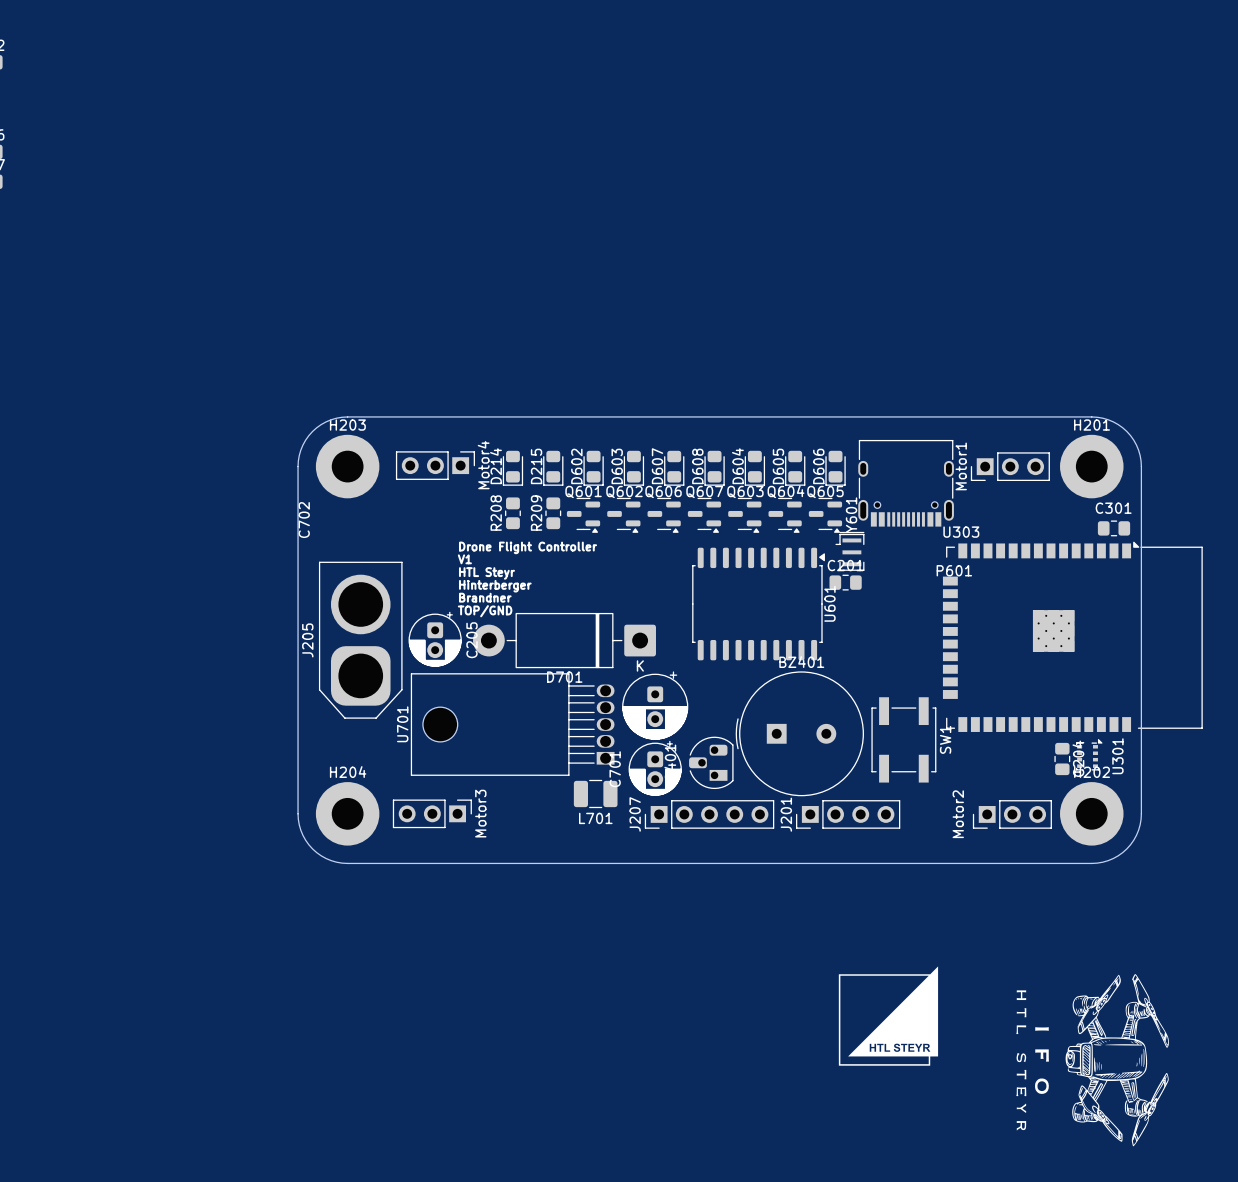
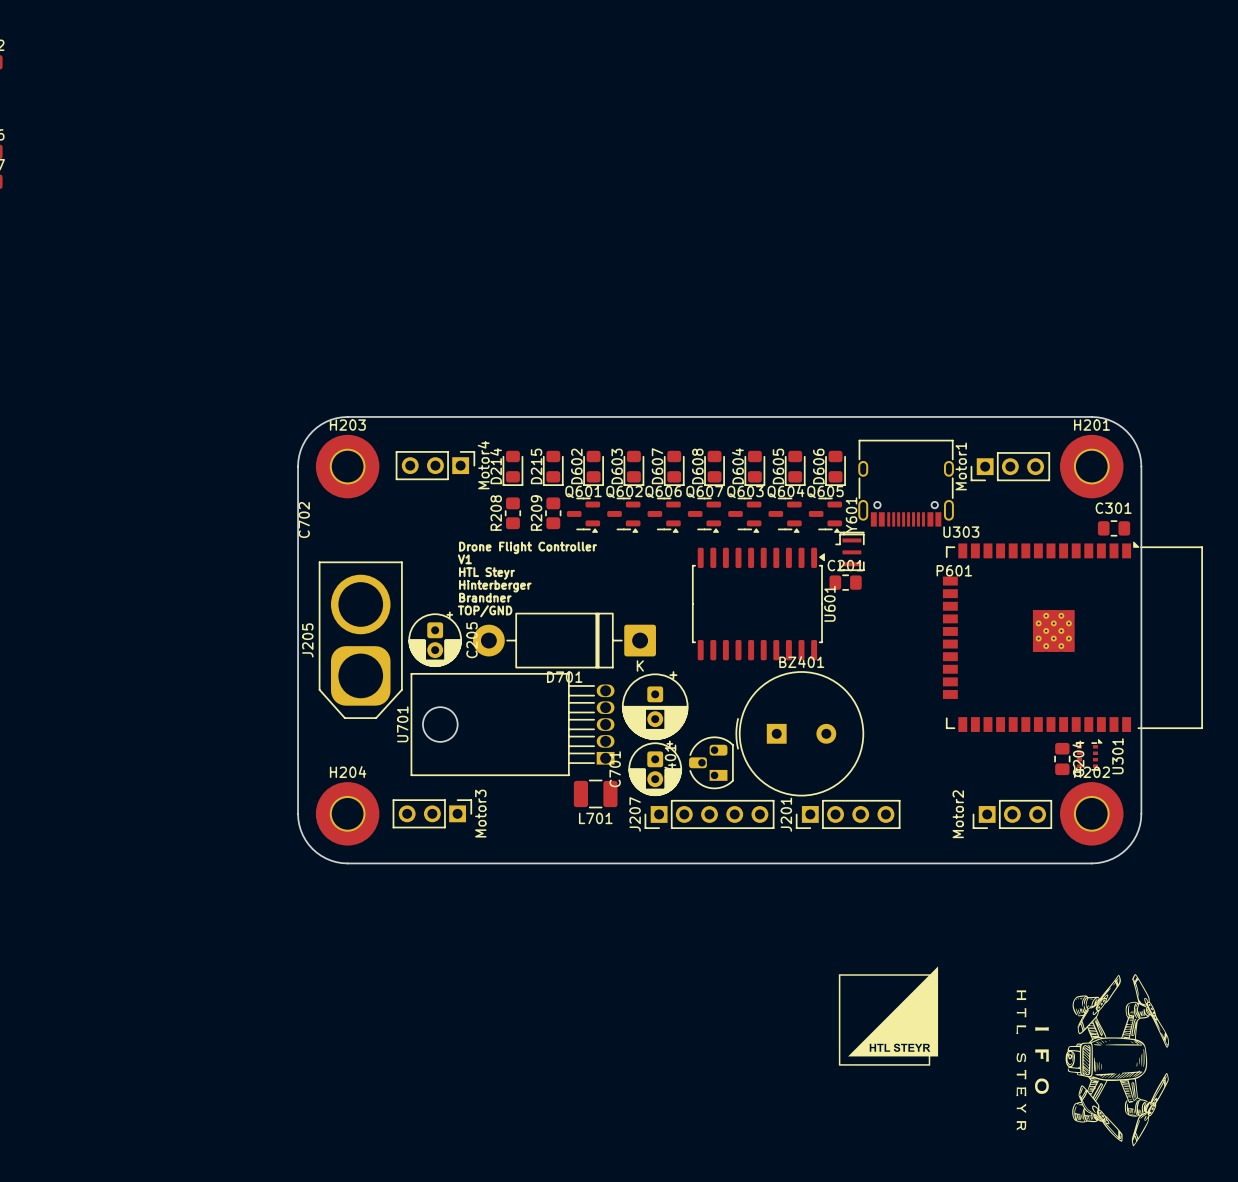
SW1: (903, 739) -> none

